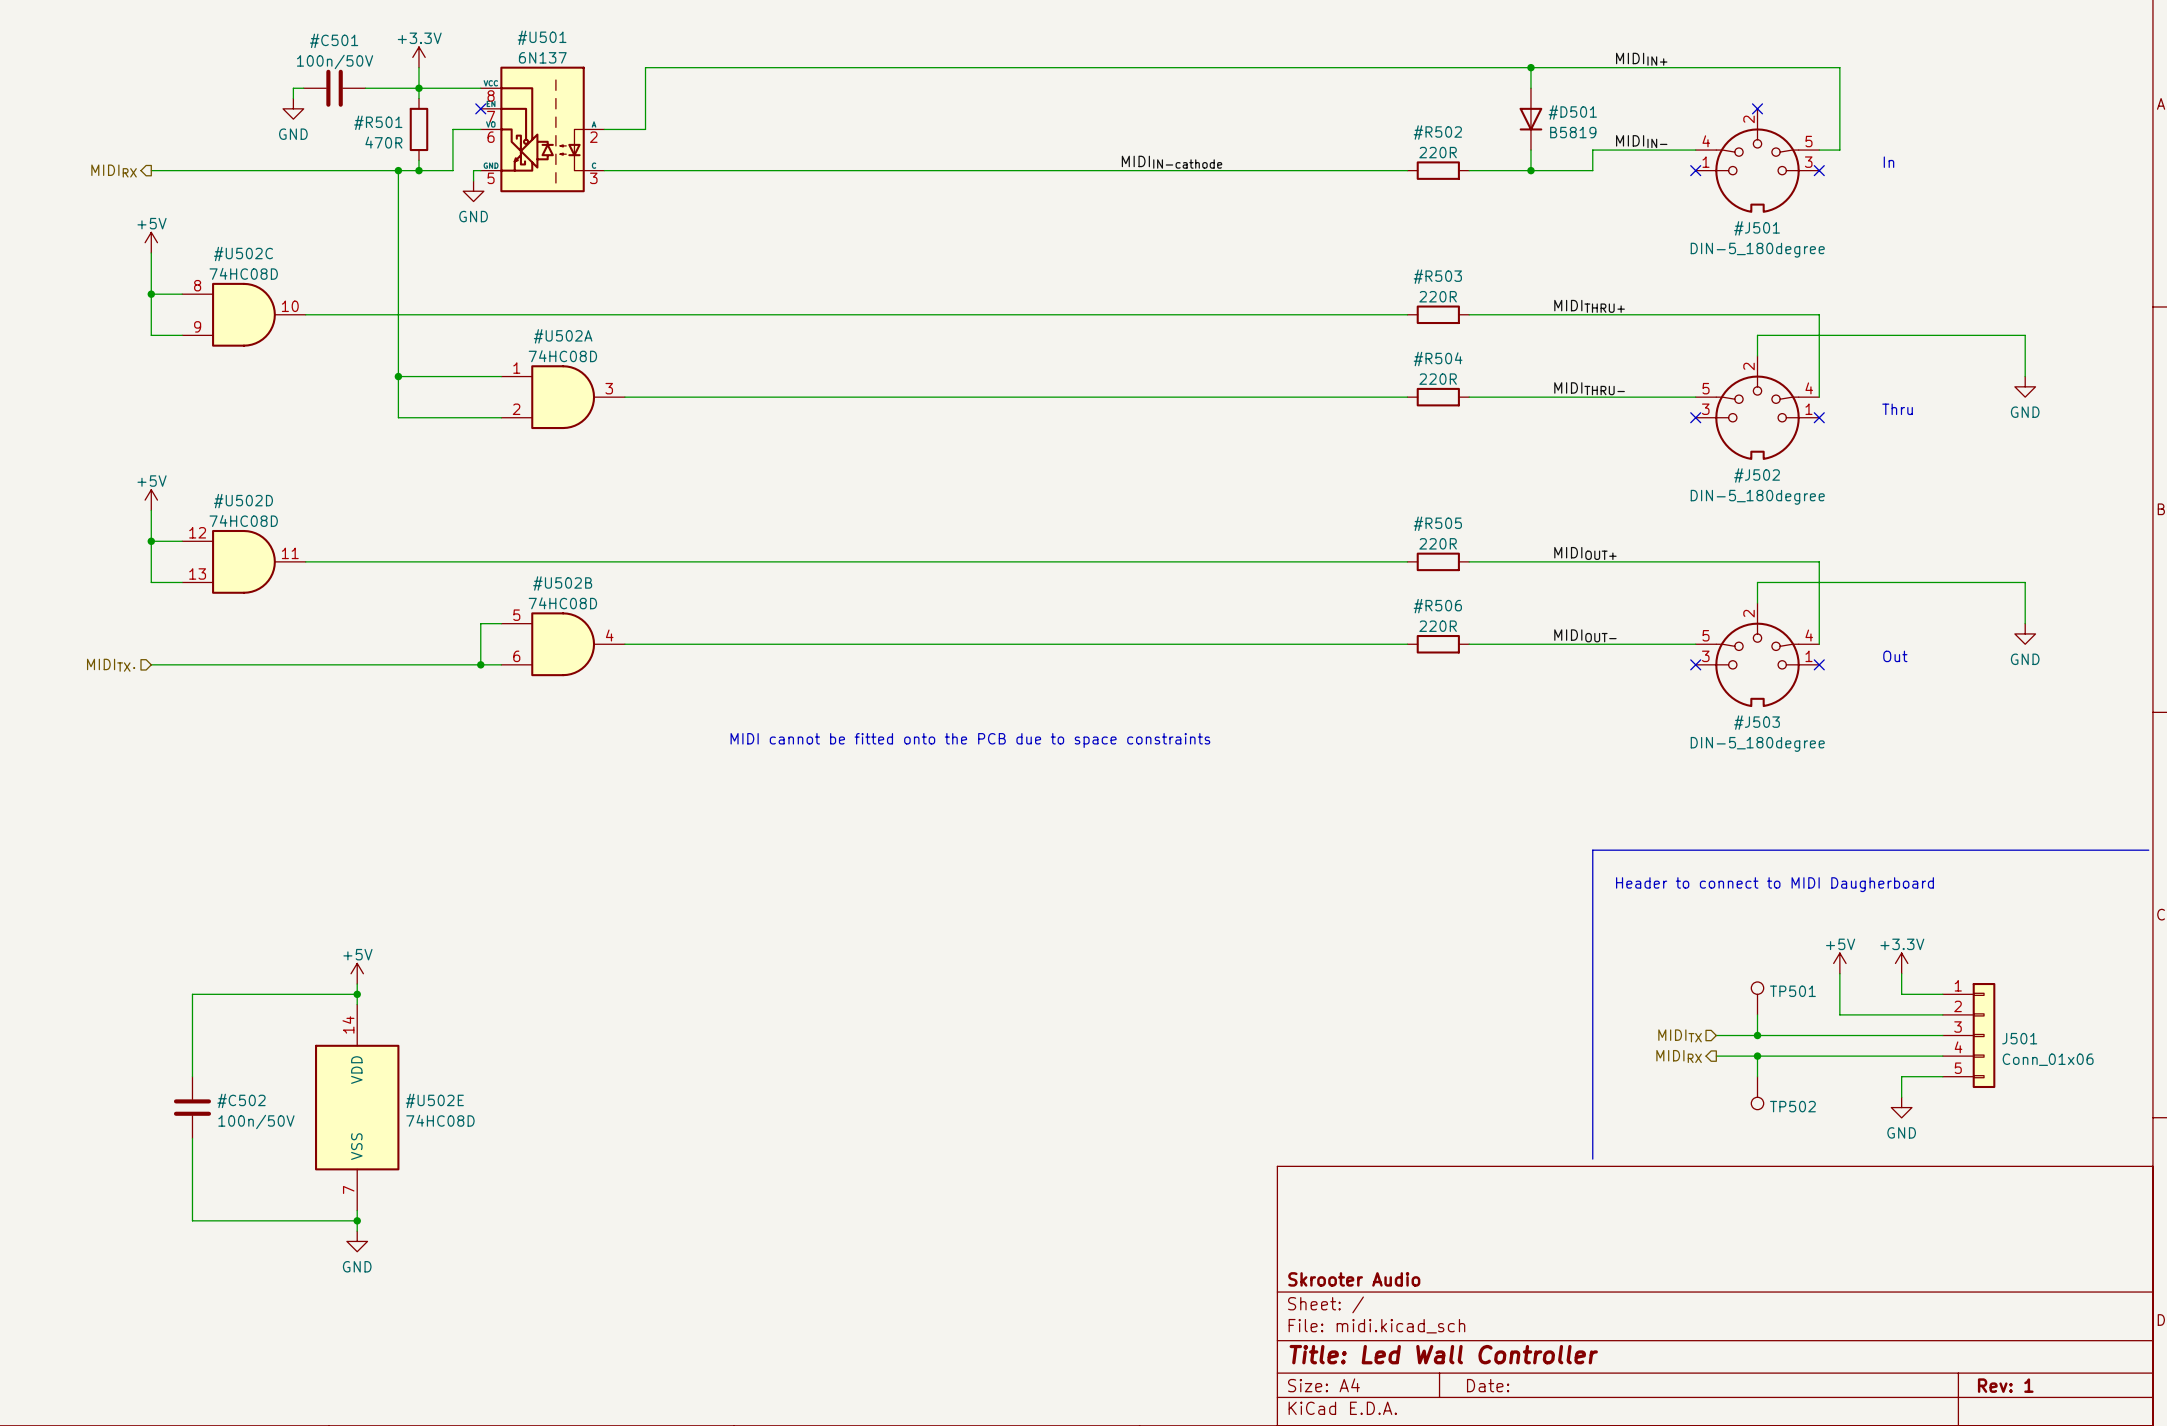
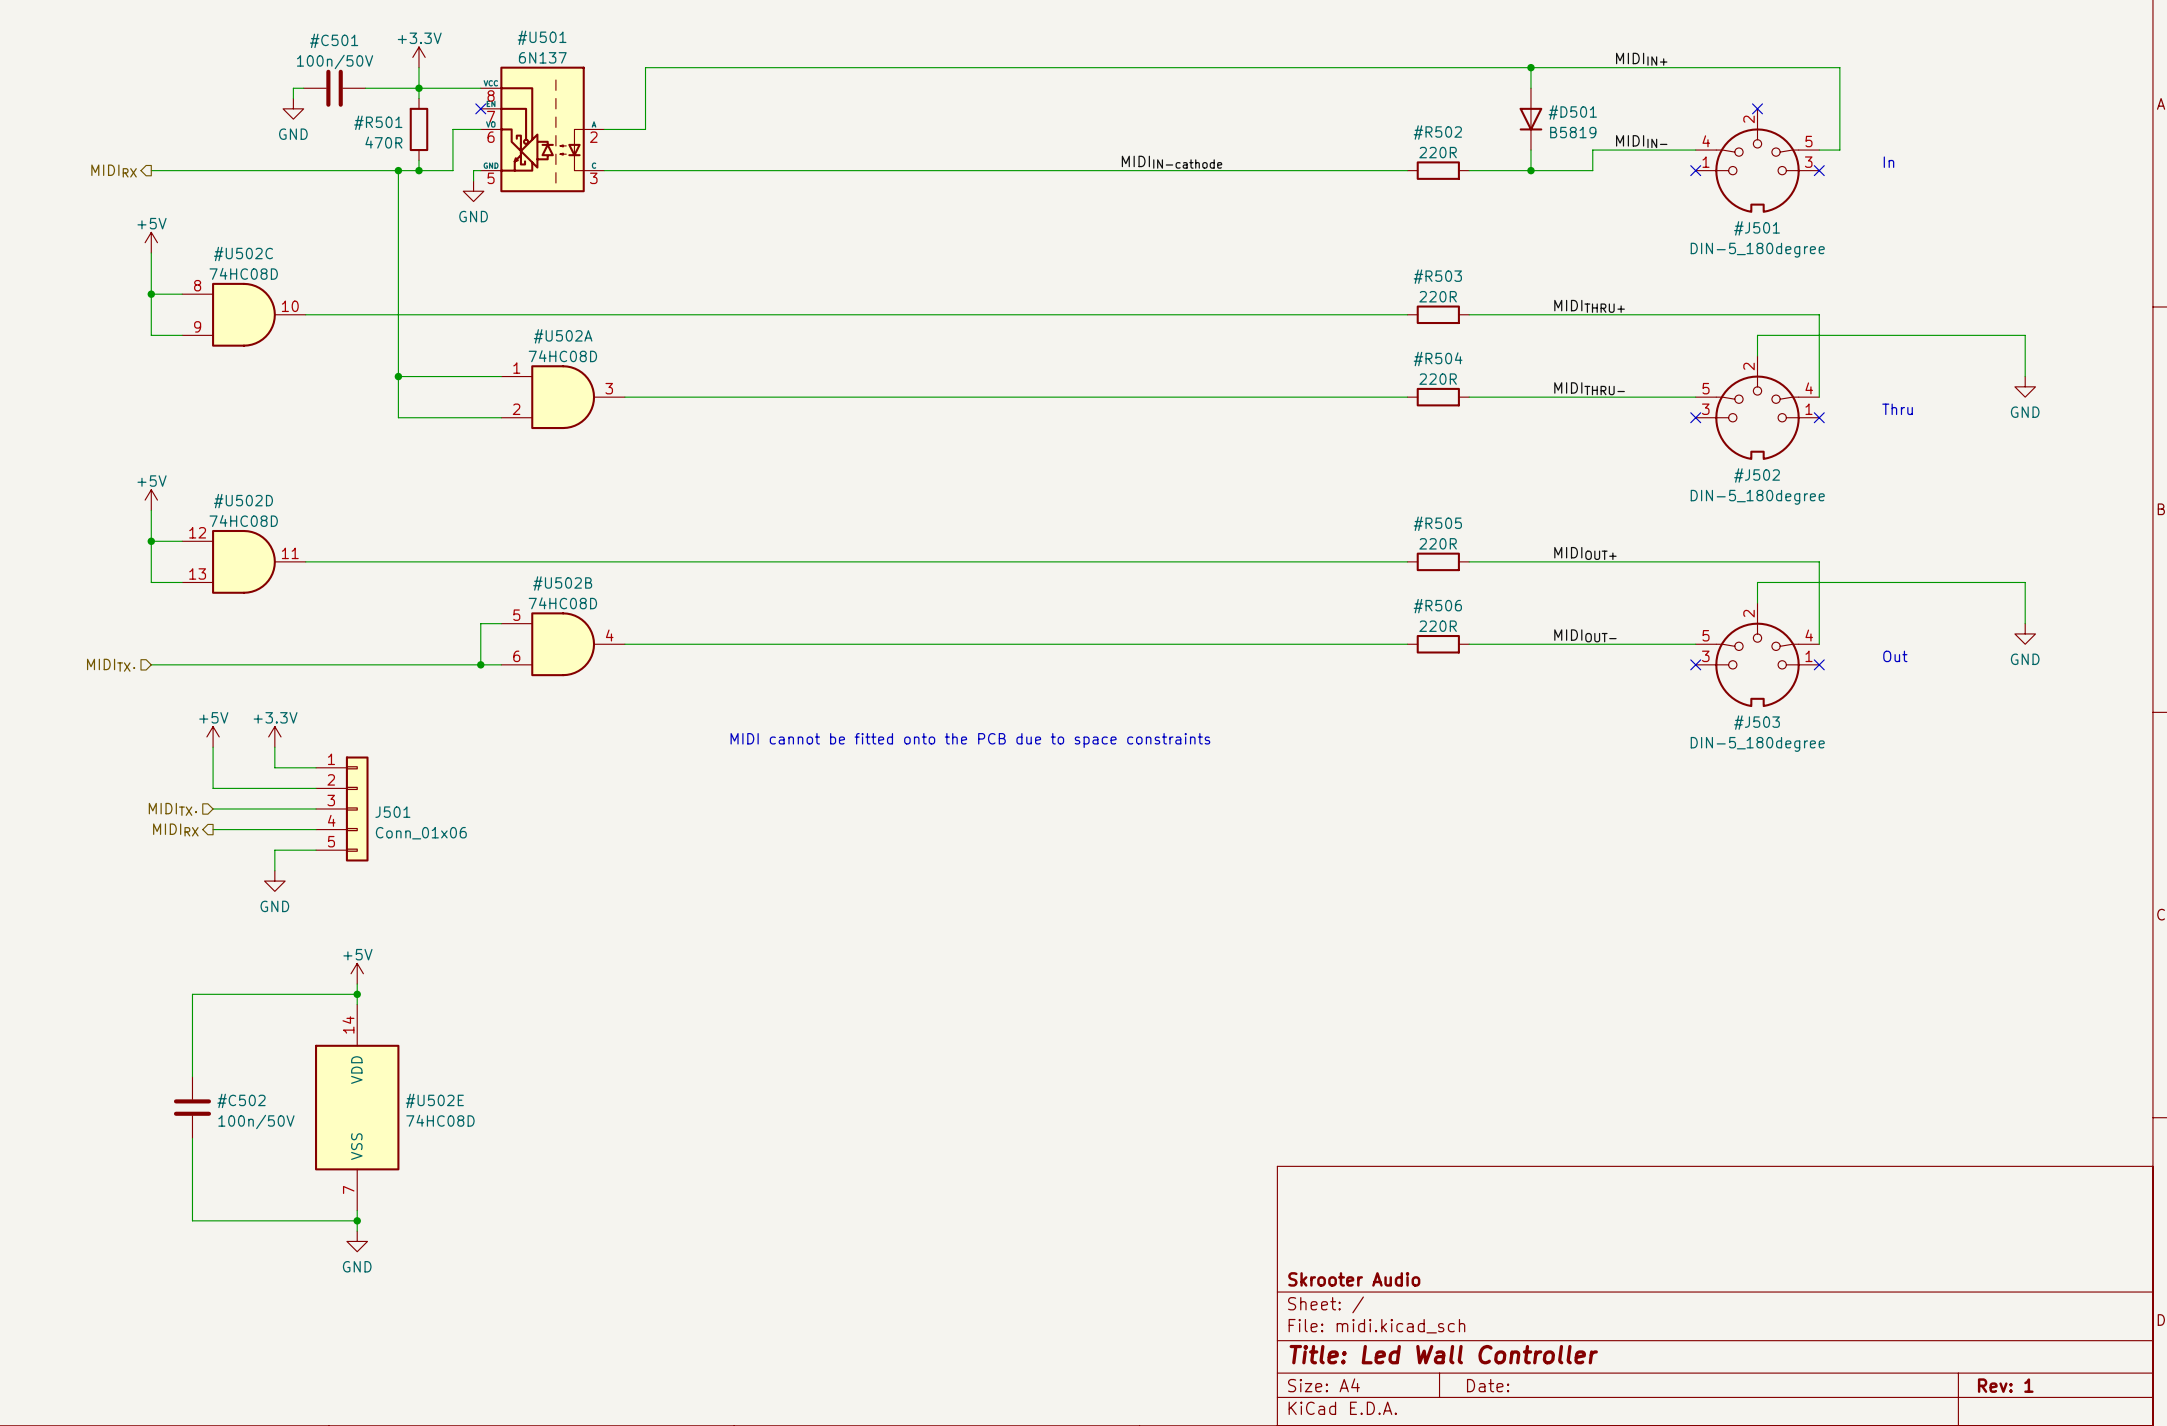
power symbol: none -> +5V (213, 736)
power symbol: none -> +3.3V (274, 736)
wire: none -> (213, 747) (213, 788) (316, 788)
wire: none -> (274, 747) (274, 767) (316, 767)
wire: none -> (213, 808) (316, 808)
hierarchical label: none -> MIDITX· (172, 809)
hierarchical label: none -> MIDIRX (175, 829)
wire: none -> (213, 829) (316, 829)
wire: none -> (316, 850) (274, 850) (274, 870)
line: (2148, 850) (1592, 850) (1592, 1159) -> none
power symbol: none -> GND (274, 881)
text: Header to connect to MIDI Daugherboard (1774, 884) -> none
power symbol: +5V (1839, 963) -> none
power symbol: +3.3V (1901, 963) -> none
wire: (1839, 973) (1839, 1014) (1942, 1014) -> none
wire: (1901, 973) (1901, 994) (1942, 994) -> none
TP501: (1757, 998) -> none
wire: (1757, 1014) (1757, 1035) -> none
hierarchical label: MIDITX (1680, 1035) -> none
wire: (1716, 1035) (1942, 1035) -> none
junction: (1757, 1035) -> none
J501 position: (1969, 1035) -> (342, 808)
hierarchical label: MIDIRX (1679, 1056) -> none
wire: (1716, 1056) (1942, 1056) -> none
wire: (1757, 1056) (1757, 1076) -> none
junction: (1757, 1056) -> none
wire: (1942, 1076) (1901, 1076) (1901, 1097) -> none
TP502: (1757, 1093) -> none
power symbol: GND (1901, 1107) -> none

